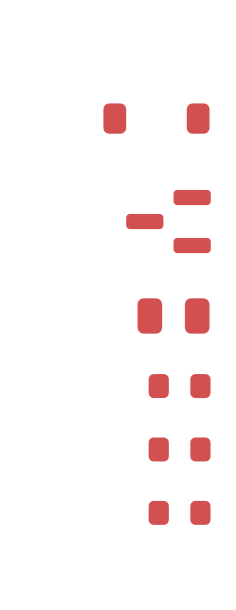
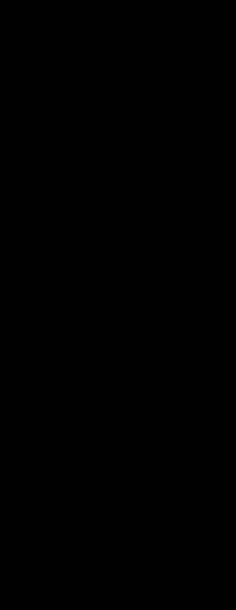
part: (156, 118) -> none
part: (168, 221) -> none
part: (173, 315) -> none
part: (179, 386) -> none
part: (179, 449) -> none
part: (179, 512) -> none

